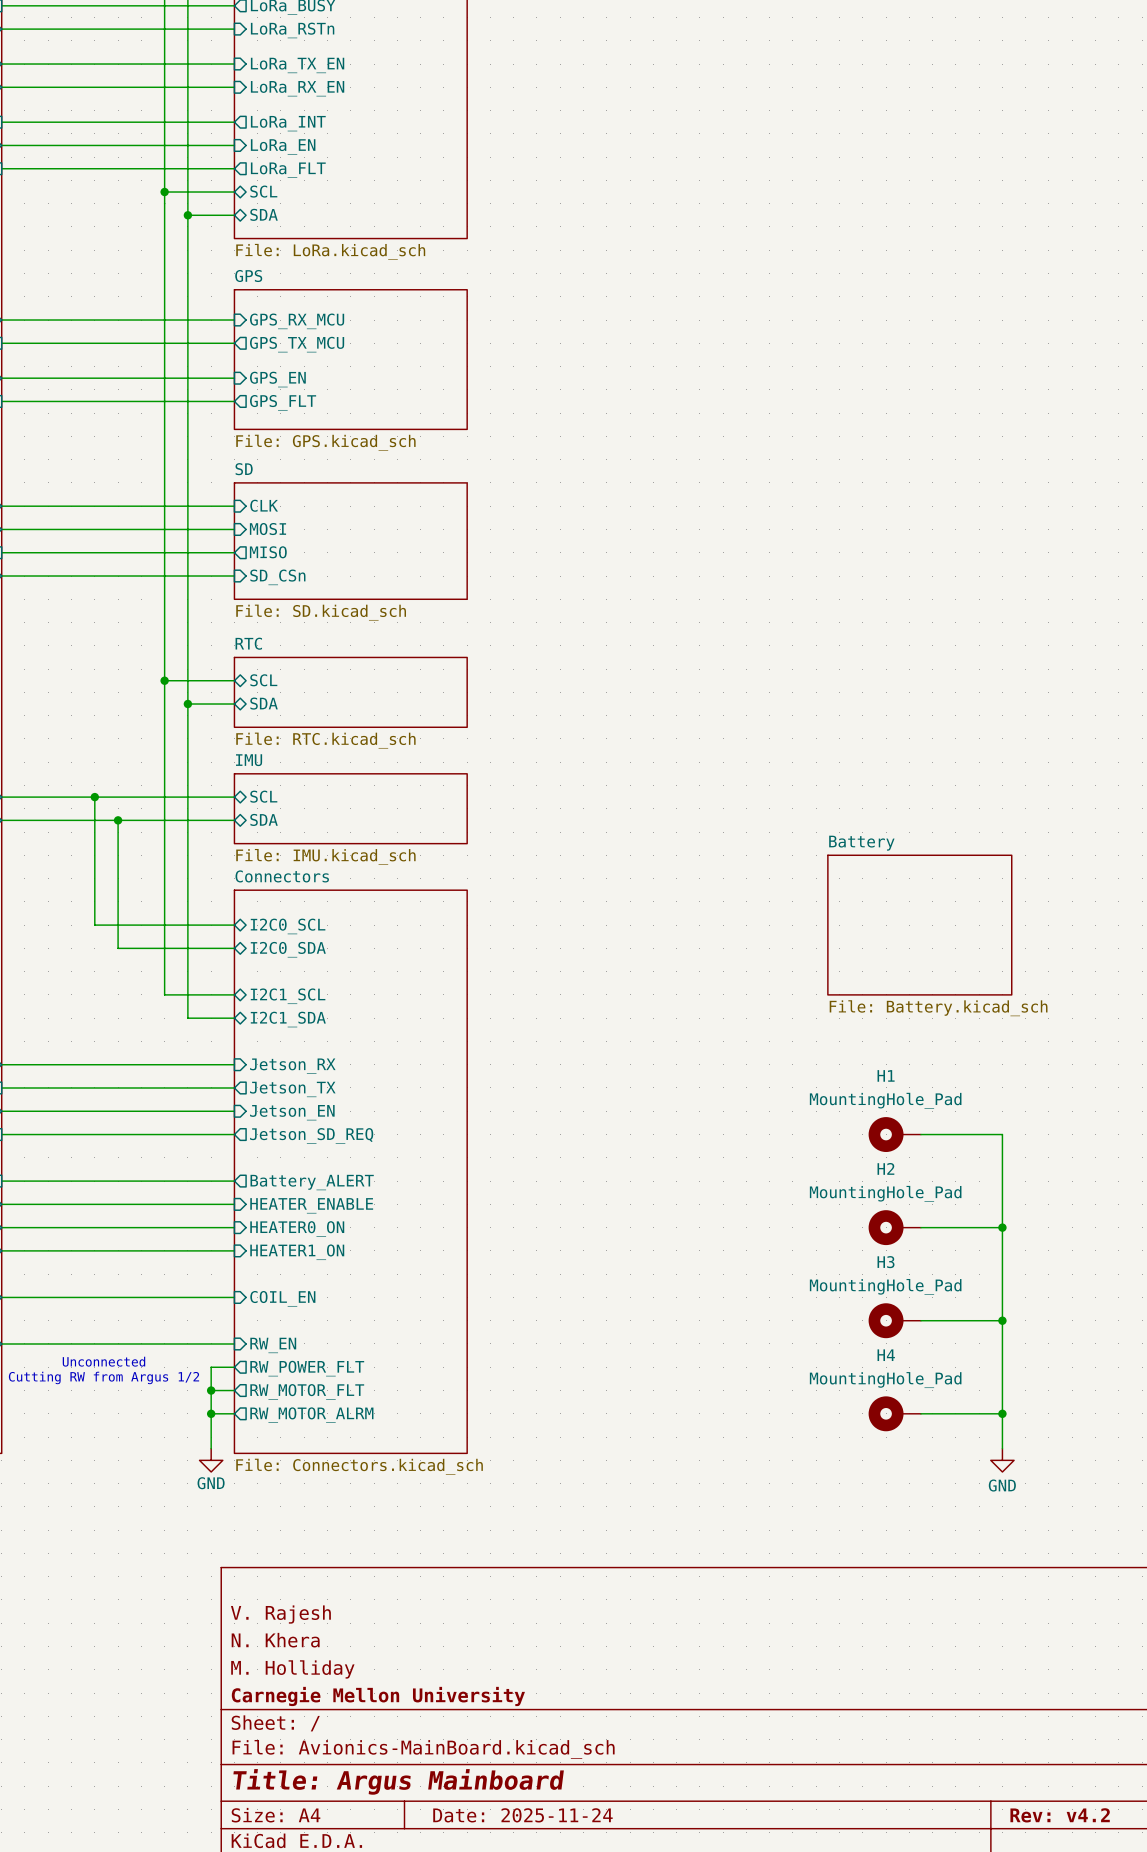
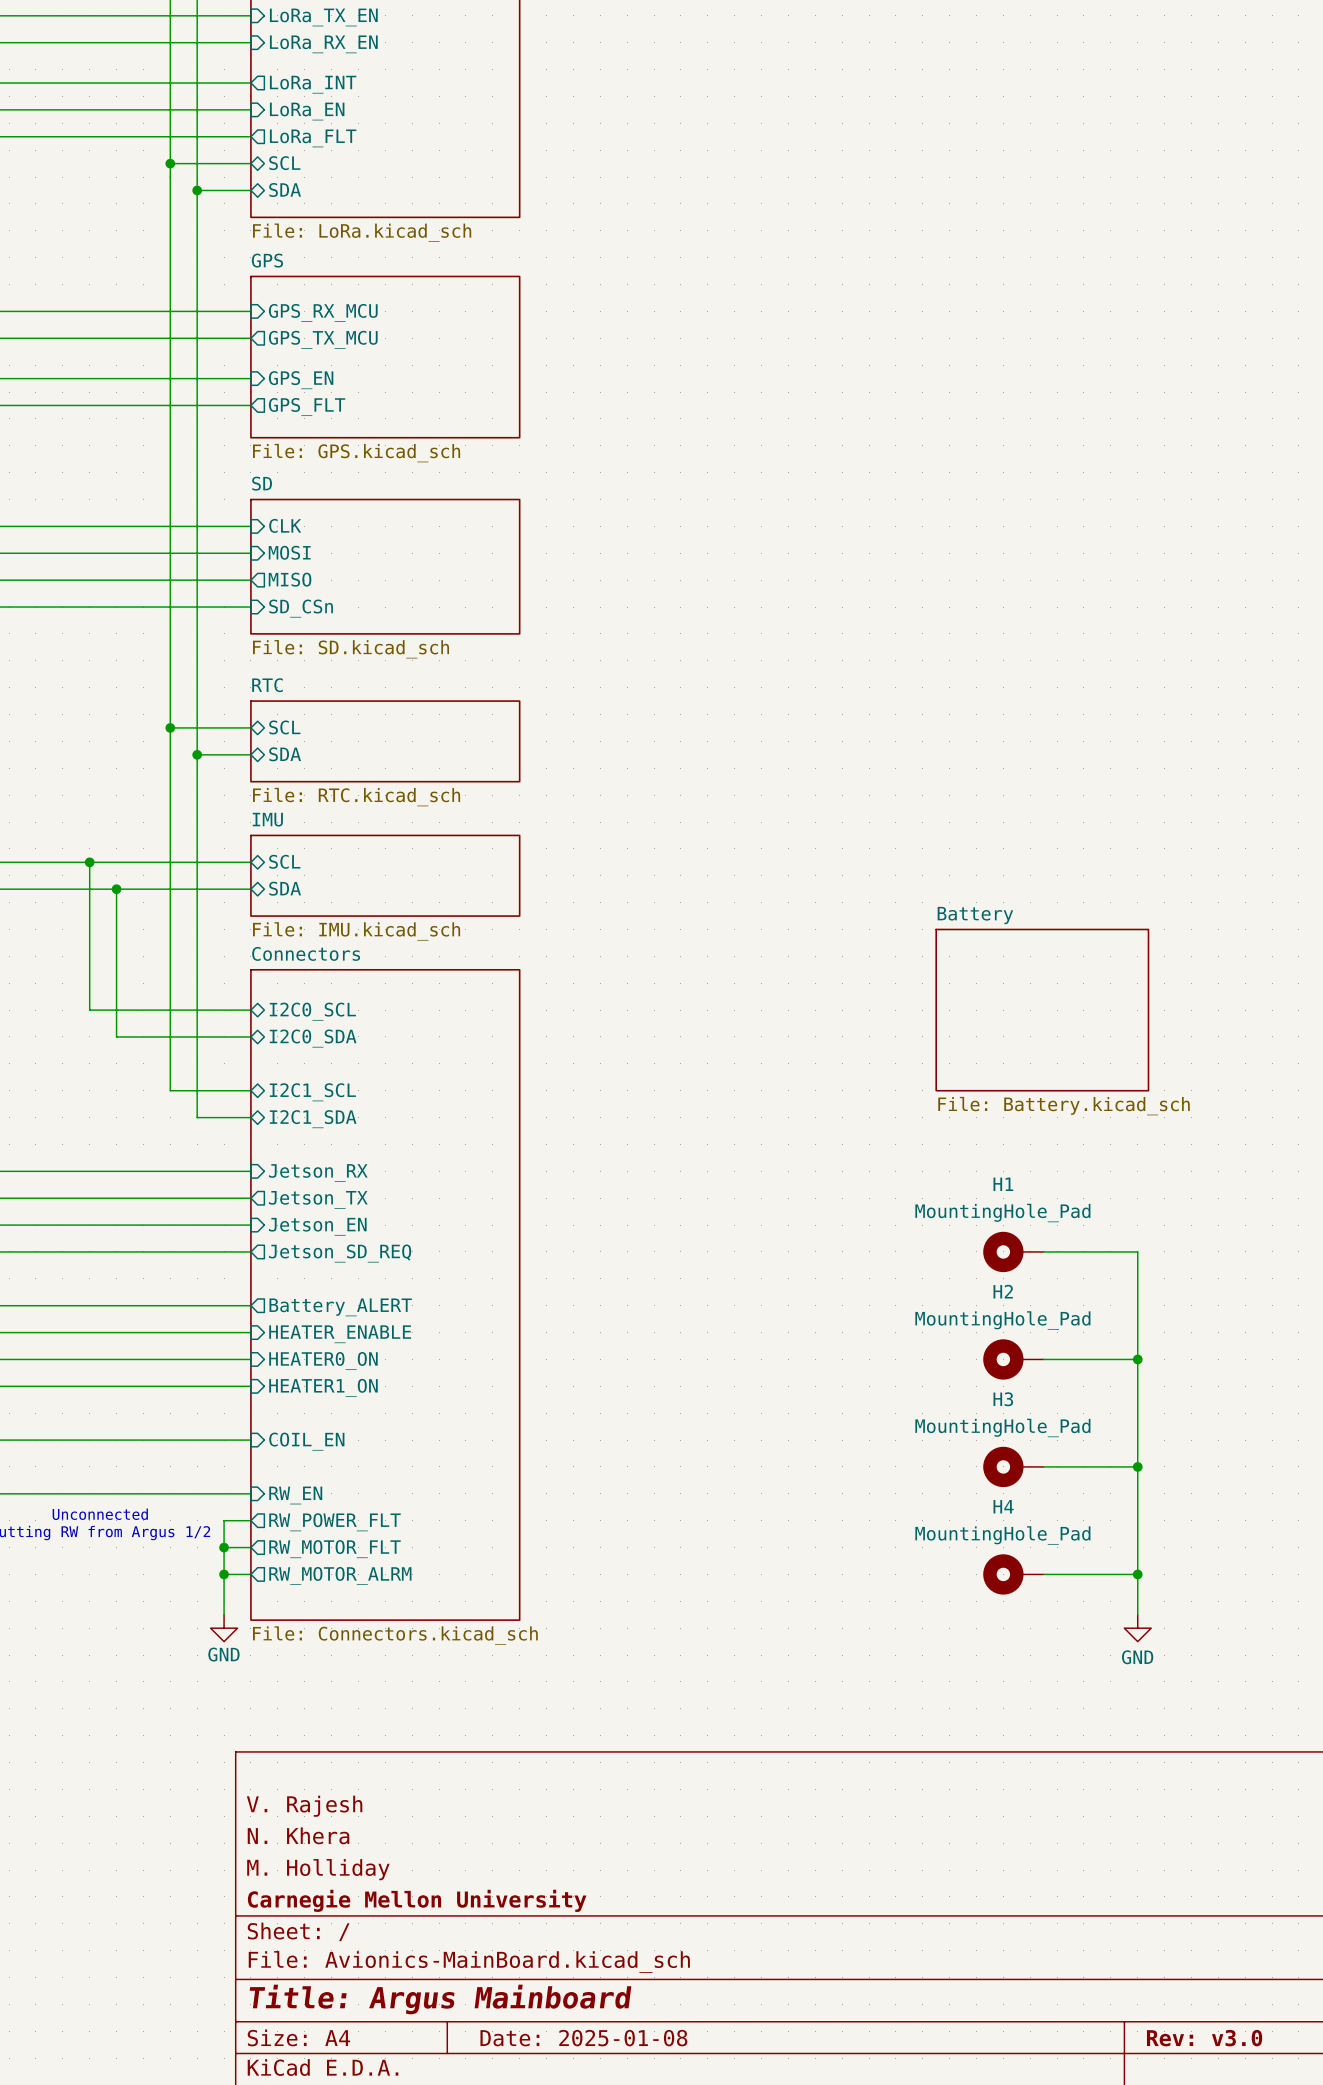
title block: Date: 2025-11-24 (522, 1815) -> Date: 2025-01-08 (583, 2038)
title block: Rev: v4.2 (1060, 1815) -> Rev: v3.0 (1204, 2038)

